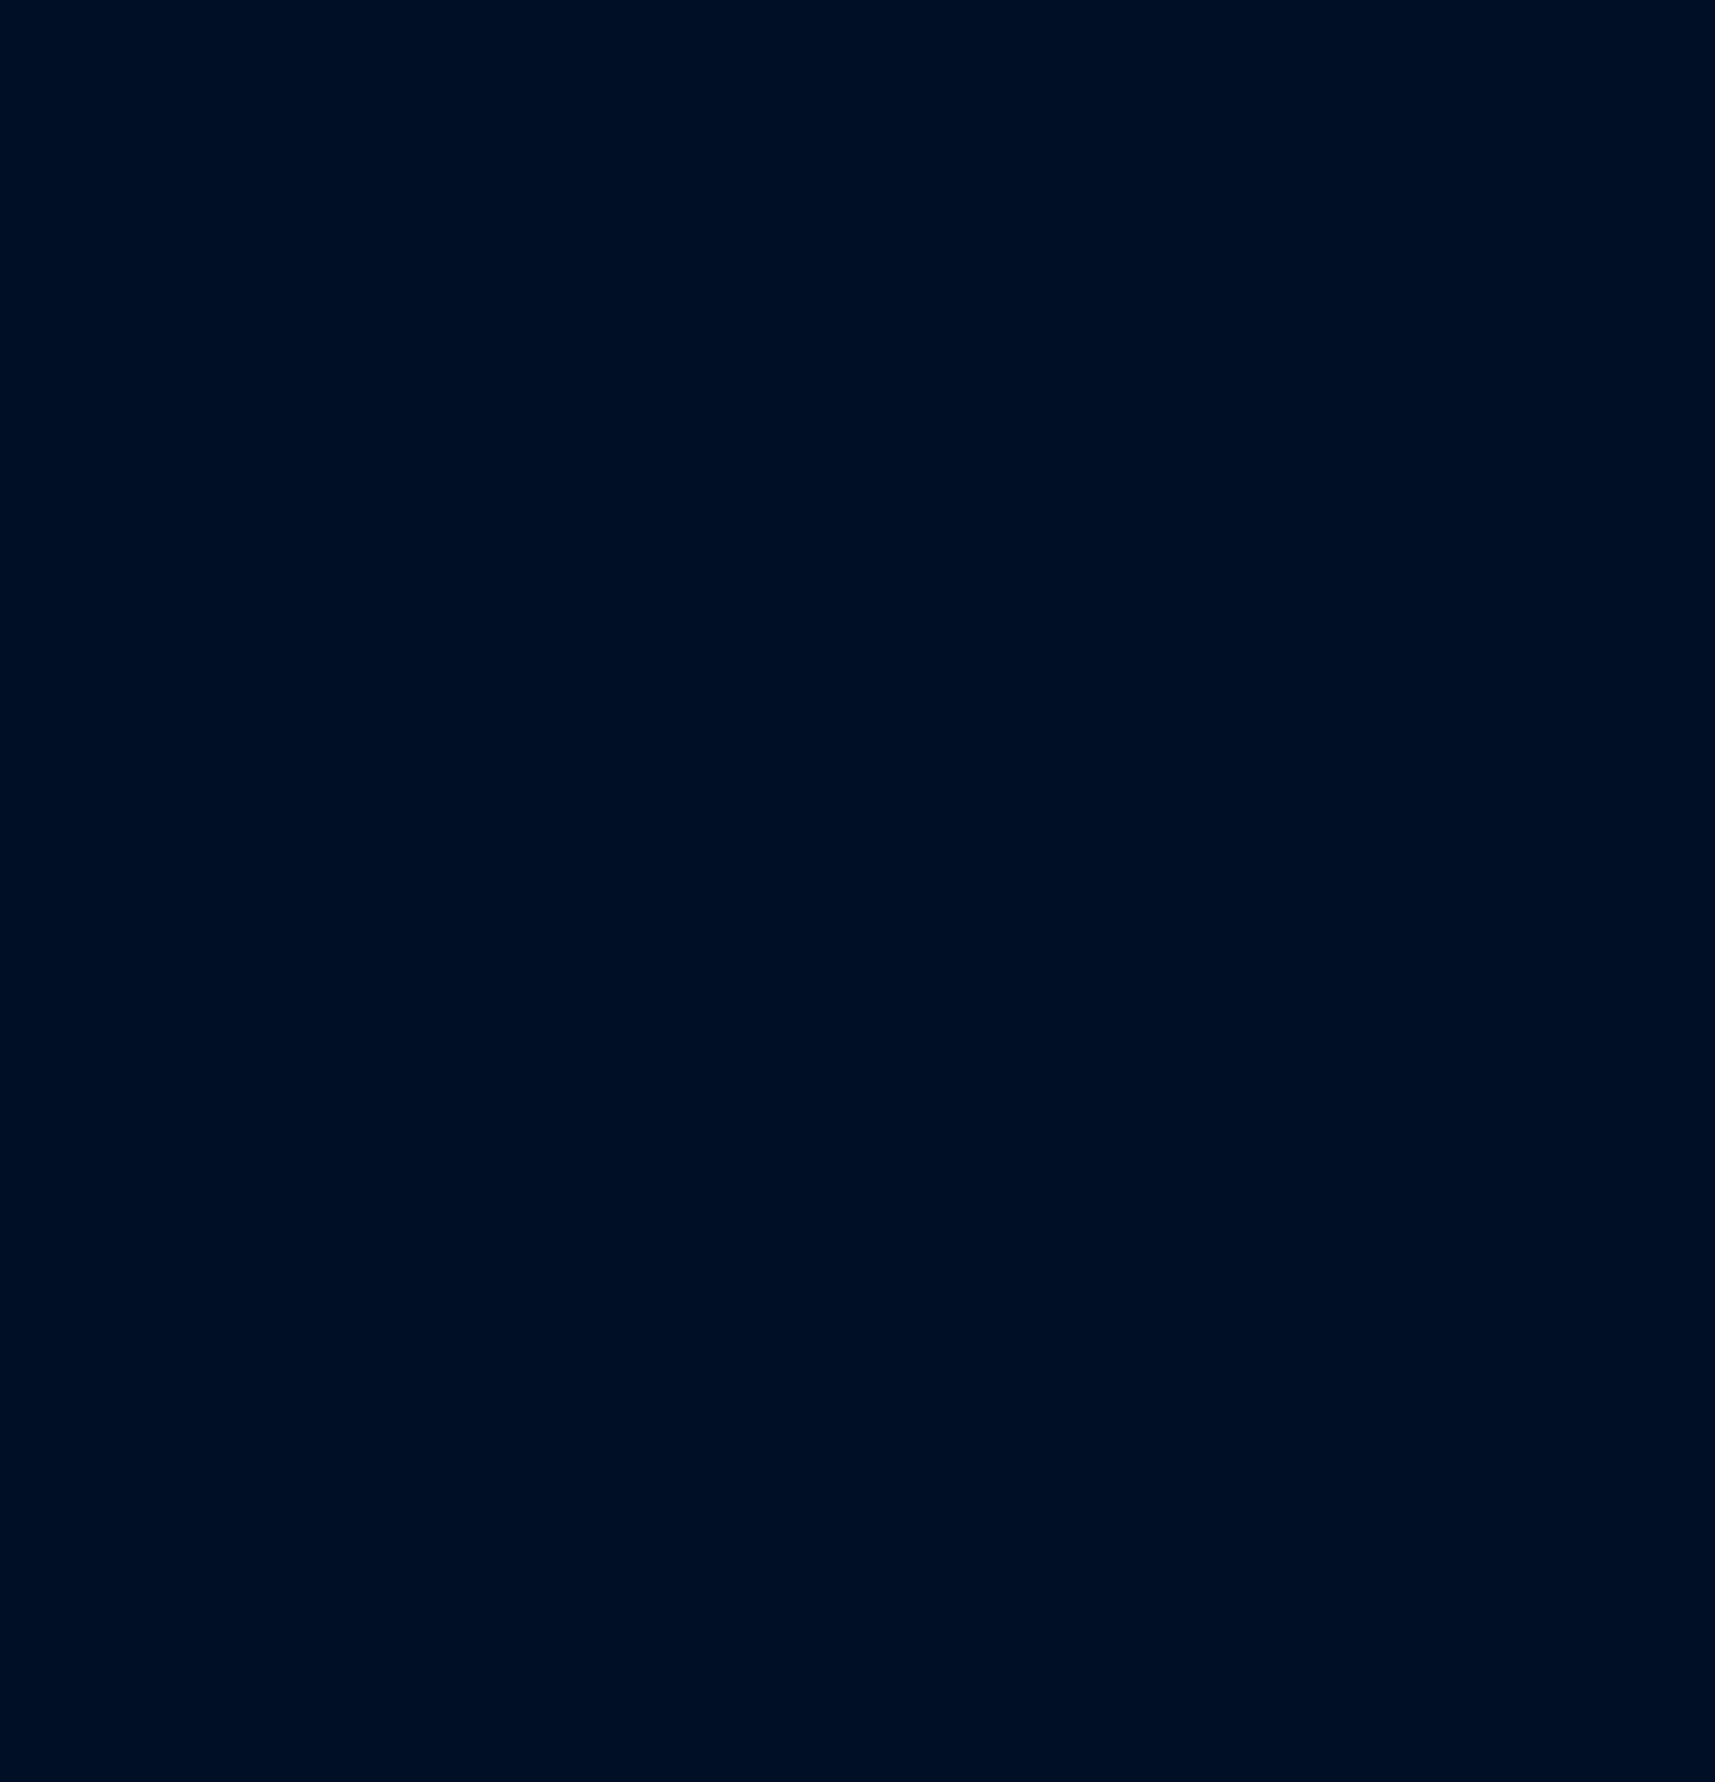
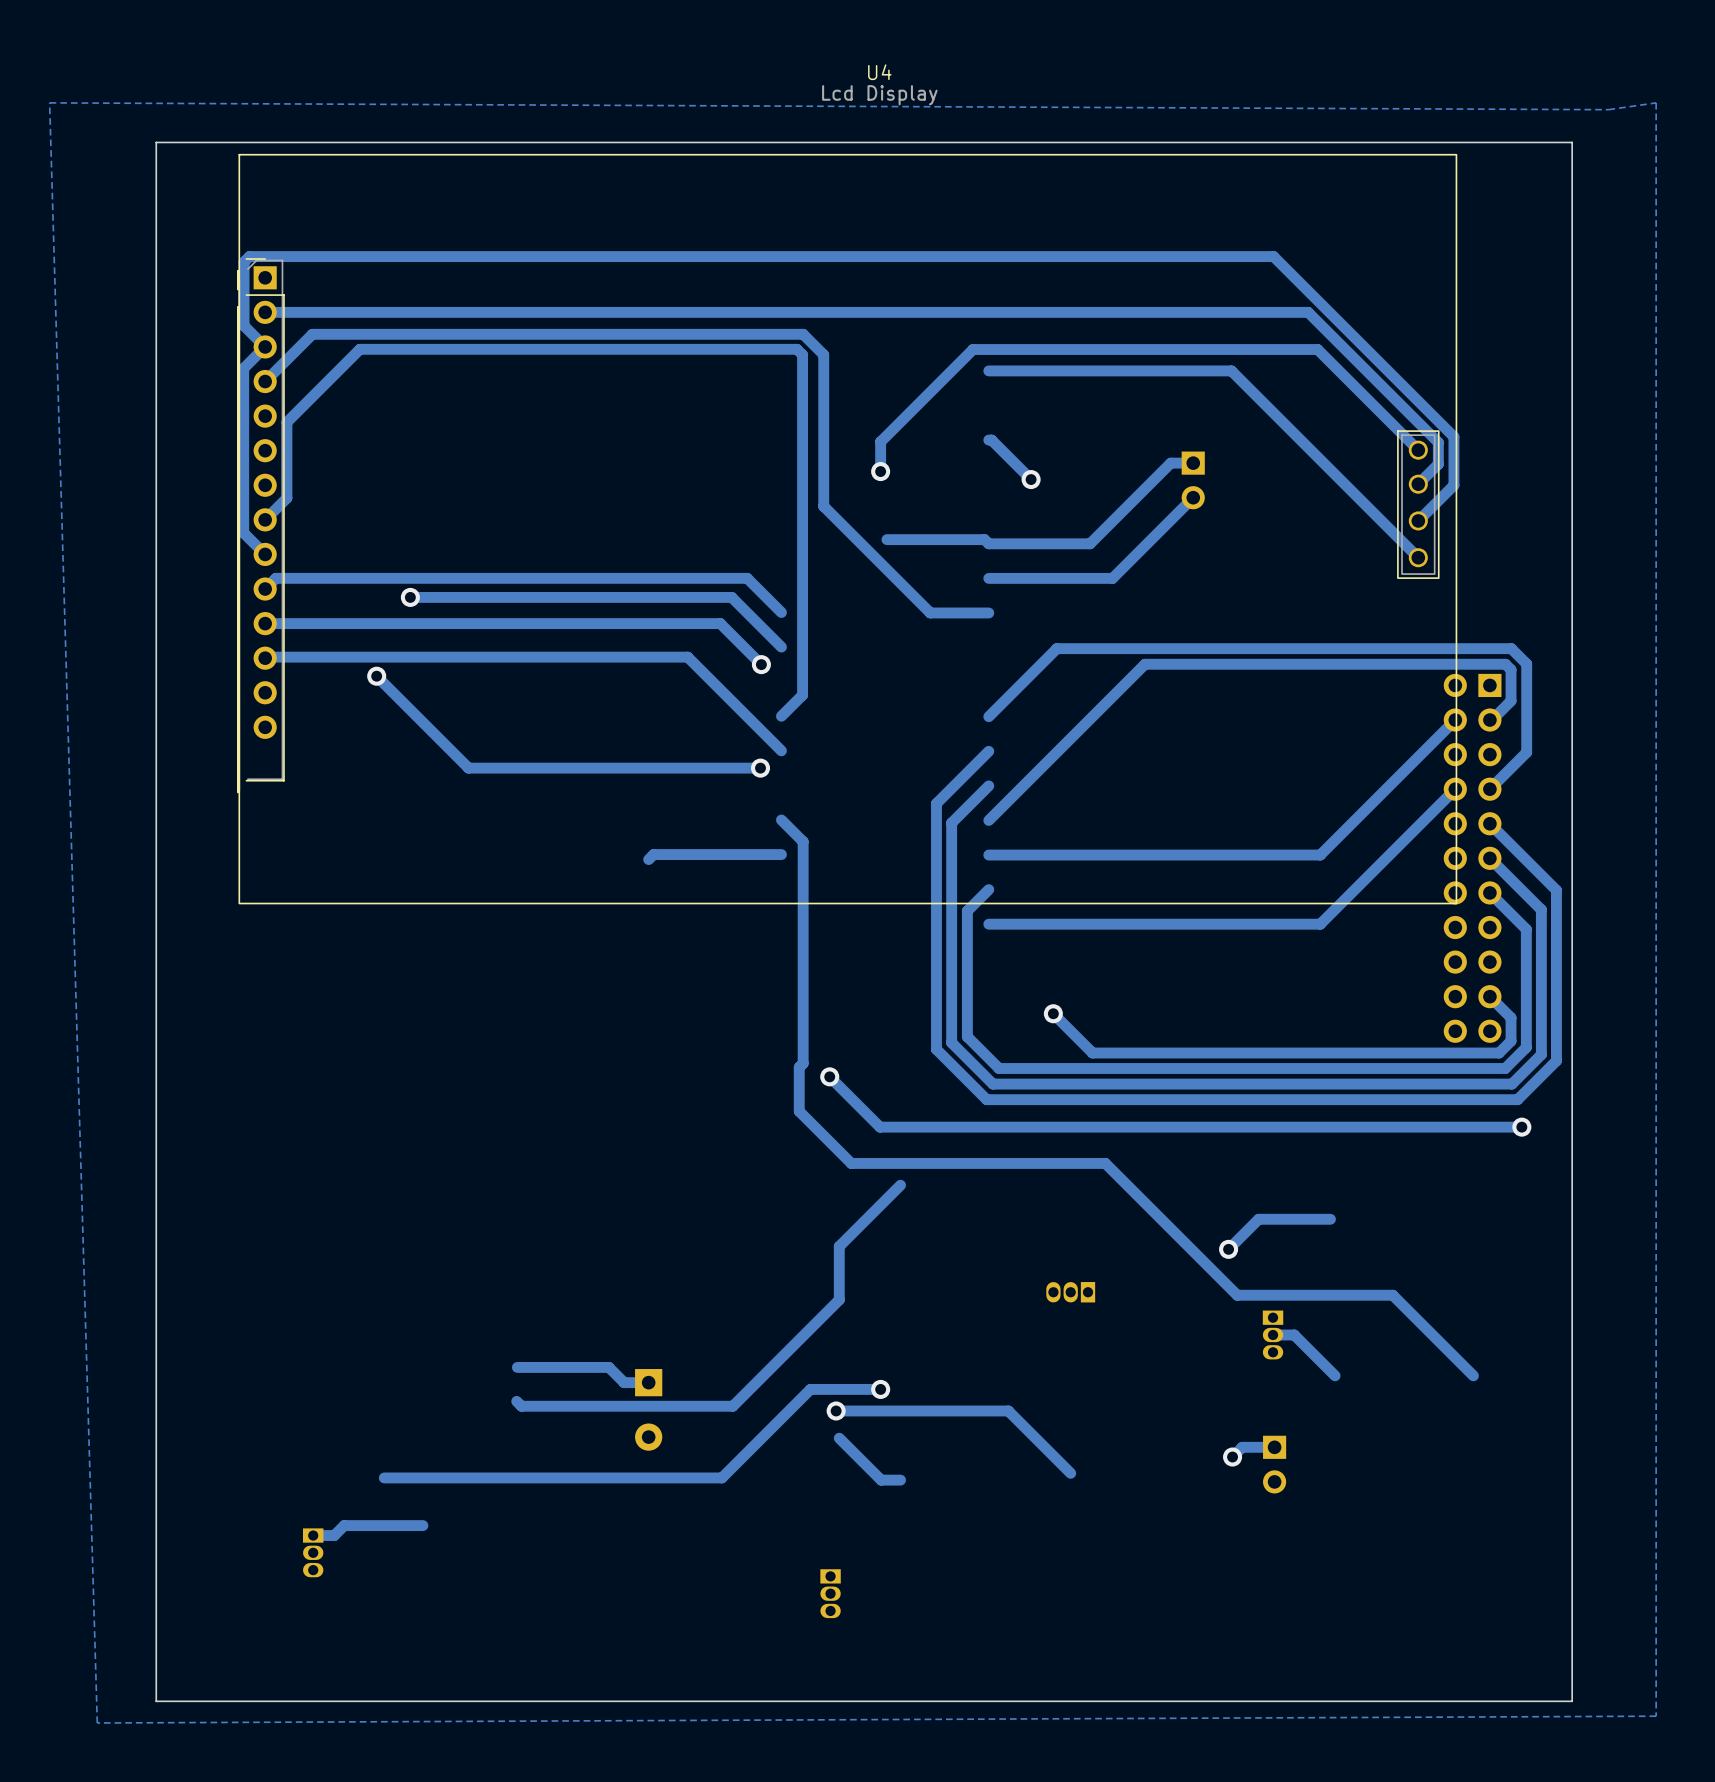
zone outline: none -> (1656, 102) (1608, 109) (49, 102) (97, 1723) (1656, 1716) (1656, 102)
board edge: none -> (1572, 142) (156, 142) (156, 1701) (1572, 1701) (1572, 142)
track: none -> (265, 312) (1308, 312) (1438, 442) (1438, 464) (1418, 484)
track: none -> (988, 370) (1231, 370) (1418, 557)
track: none -> (265, 381) (312, 334) (803, 334) (823, 354) (823, 506) (930, 612) (988, 612)
track: none -> (988, 440) (991, 440) (1031, 479)
track: none -> (1418, 450) (1317, 349) (973, 349) (880, 441) (880, 471)
track: none -> (1193, 463) (1170, 463) (1090, 543) (988, 543) (984, 539) (886, 539)
via: none -> (880, 471)
via: none -> (1031, 479)
part: none -> (1193, 480)
track: none -> (1193, 497) (1112, 578) (988, 578)
track: none -> (265, 519) (286, 498) (286, 422) (359, 349) (796, 349) (802, 354) (802, 695) (781, 716)
track: none -> (1418, 520) (1453, 485) (1453, 436) (1273, 256) (249, 256) (244, 262) (244, 325) (265, 346) (243, 368) (243, 532) (265, 554)
U4: none -> Lcd Display (847, 529)
track: none -> (265, 589) (275, 578) (747, 578) (781, 612)
track: none -> (410, 597) (731, 597) (781, 647)
via: none -> (410, 597)
track: none -> (265, 623) (720, 623) (761, 664)
track: none -> (265, 658) (687, 657) (781, 750)
via: none -> (761, 664)
track: none -> (376, 676) (468, 768) (760, 768)
via: none -> (376, 676)
track: none -> (988, 716) (1056, 648) (1511, 648) (1526, 663) (1526, 752) (1489, 789)
track: none -> (1455, 720) (1320, 855) (988, 855)
track: none -> (1489, 720) (1511, 700) (1511, 669) (1505, 664) (1144, 664) (988, 820)
track: none -> (988, 751) (936, 803) (936, 1049) (986, 1099) (1517, 1099) (1556, 1060) (1556, 890) (1489, 823)
via: none -> (760, 768)
track: none -> (988, 785) (951, 823) (951, 1042) (992, 1084) (1511, 1084) (1541, 1054) (1541, 909) (1489, 858)
track: none -> (1455, 789) (1320, 924) (988, 924)
track: none -> (781, 819) (803, 841) (803, 1063) (799, 1067) (799, 1111) (851, 1163) (1105, 1163) (1237, 1295) (1392, 1295) (1473, 1375)
track: none -> (781, 854) (653, 854) (648, 859)
part: none -> (1472, 858)
track: none -> (988, 889) (967, 911) (967, 1036) (999, 1068) (1505, 1068) (1526, 1047) (1526, 929) (1489, 892)
track: none -> (1489, 996) (1511, 1017) (1511, 1041) (1499, 1053) (1092, 1053) (1053, 1013)
via: none -> (1053, 1013)
track: none -> (829, 1076) (880, 1127) (1521, 1127)
via: none -> (829, 1076)
via: none -> (1521, 1127)
track: none -> (900, 1185) (839, 1246) (839, 1299) (732, 1406) (521, 1406) (516, 1401)
track: none -> (1330, 1219) (1258, 1219) (1228, 1249)
via: none -> (1228, 1249)
part: none -> (1070, 1292)
track: none -> (1273, 1334) (1294, 1334) (1335, 1375)
part: none -> (1273, 1334)
track: none -> (517, 1367) (608, 1367) (624, 1382) (648, 1382)
track: none -> (880, 1389) (810, 1389) (721, 1477) (384, 1477)
via: none -> (880, 1389)
part: none -> (648, 1409)
track: none -> (836, 1410) (1008, 1410) (1070, 1473)
via: none -> (836, 1410)
track: none -> (839, 1438) (881, 1480) (900, 1480)
track: none -> (1274, 1447) (1242, 1447) (1232, 1457)
via: none -> (1232, 1457)
part: none -> (1274, 1464)
track: none -> (422, 1525) (344, 1525) (334, 1535) (313, 1535)
part: none -> (313, 1552)
part: none -> (830, 1593)

